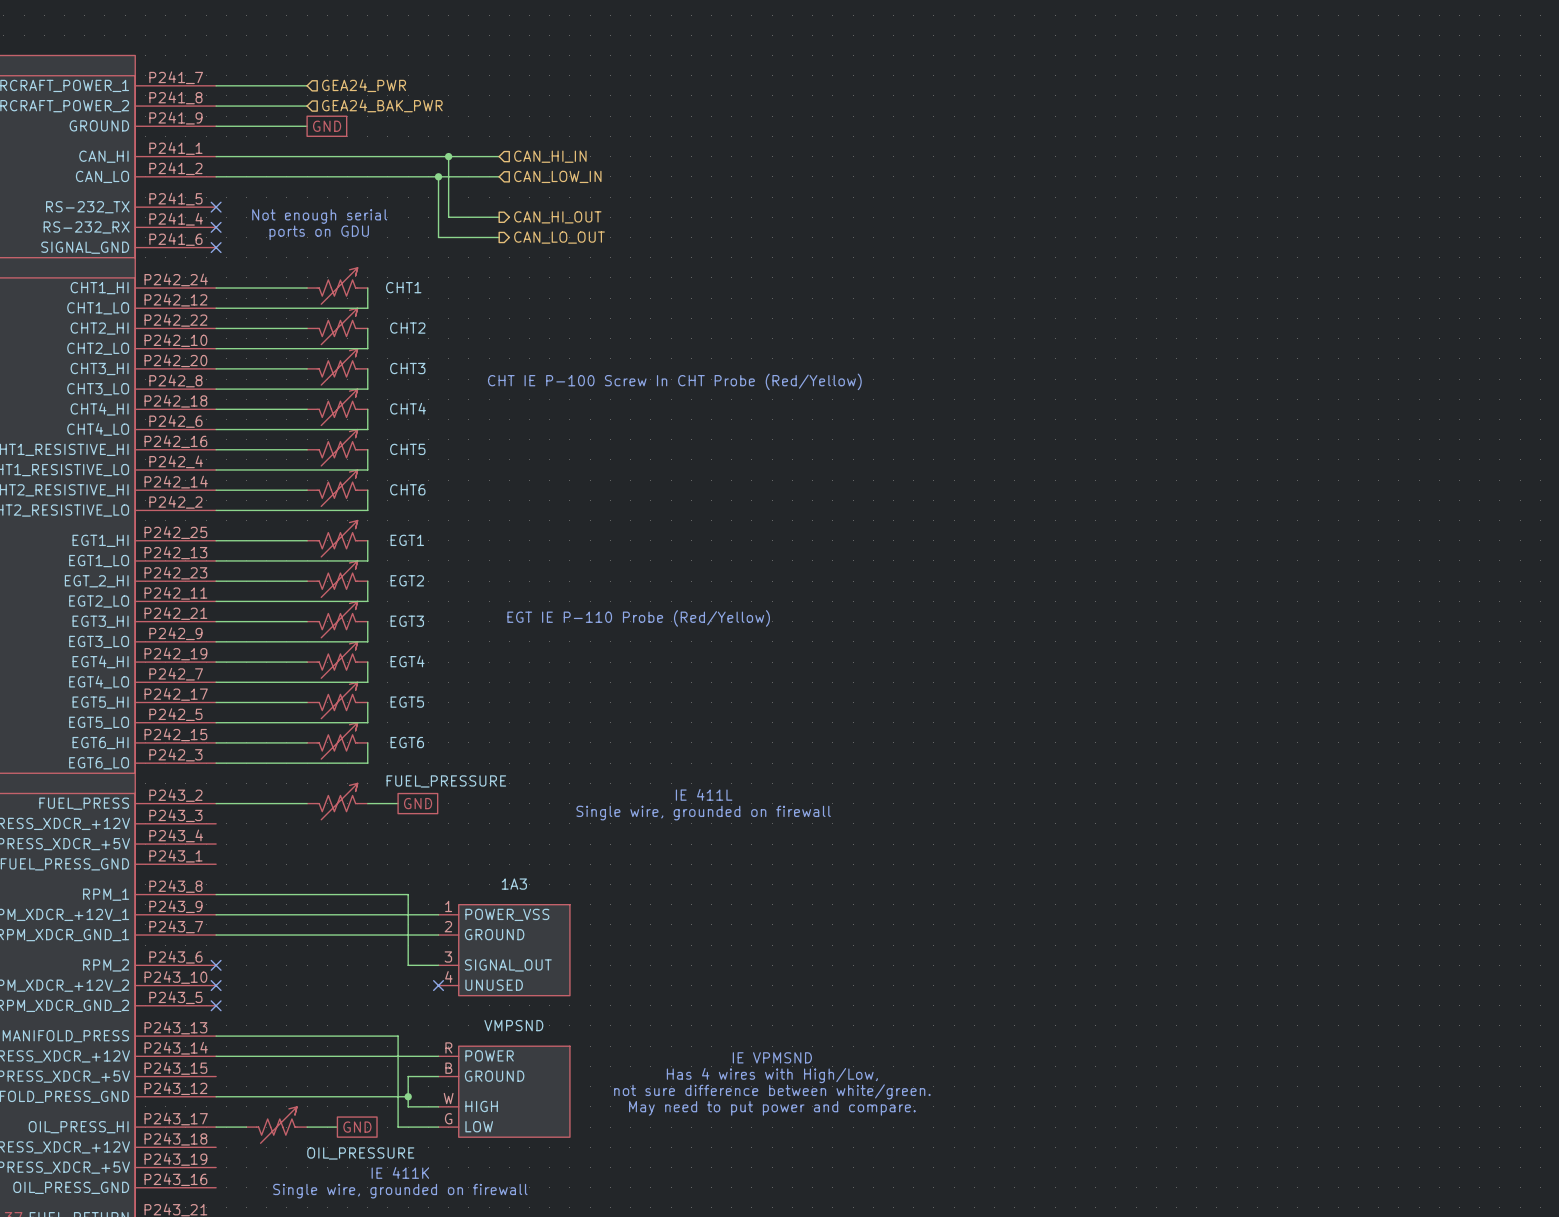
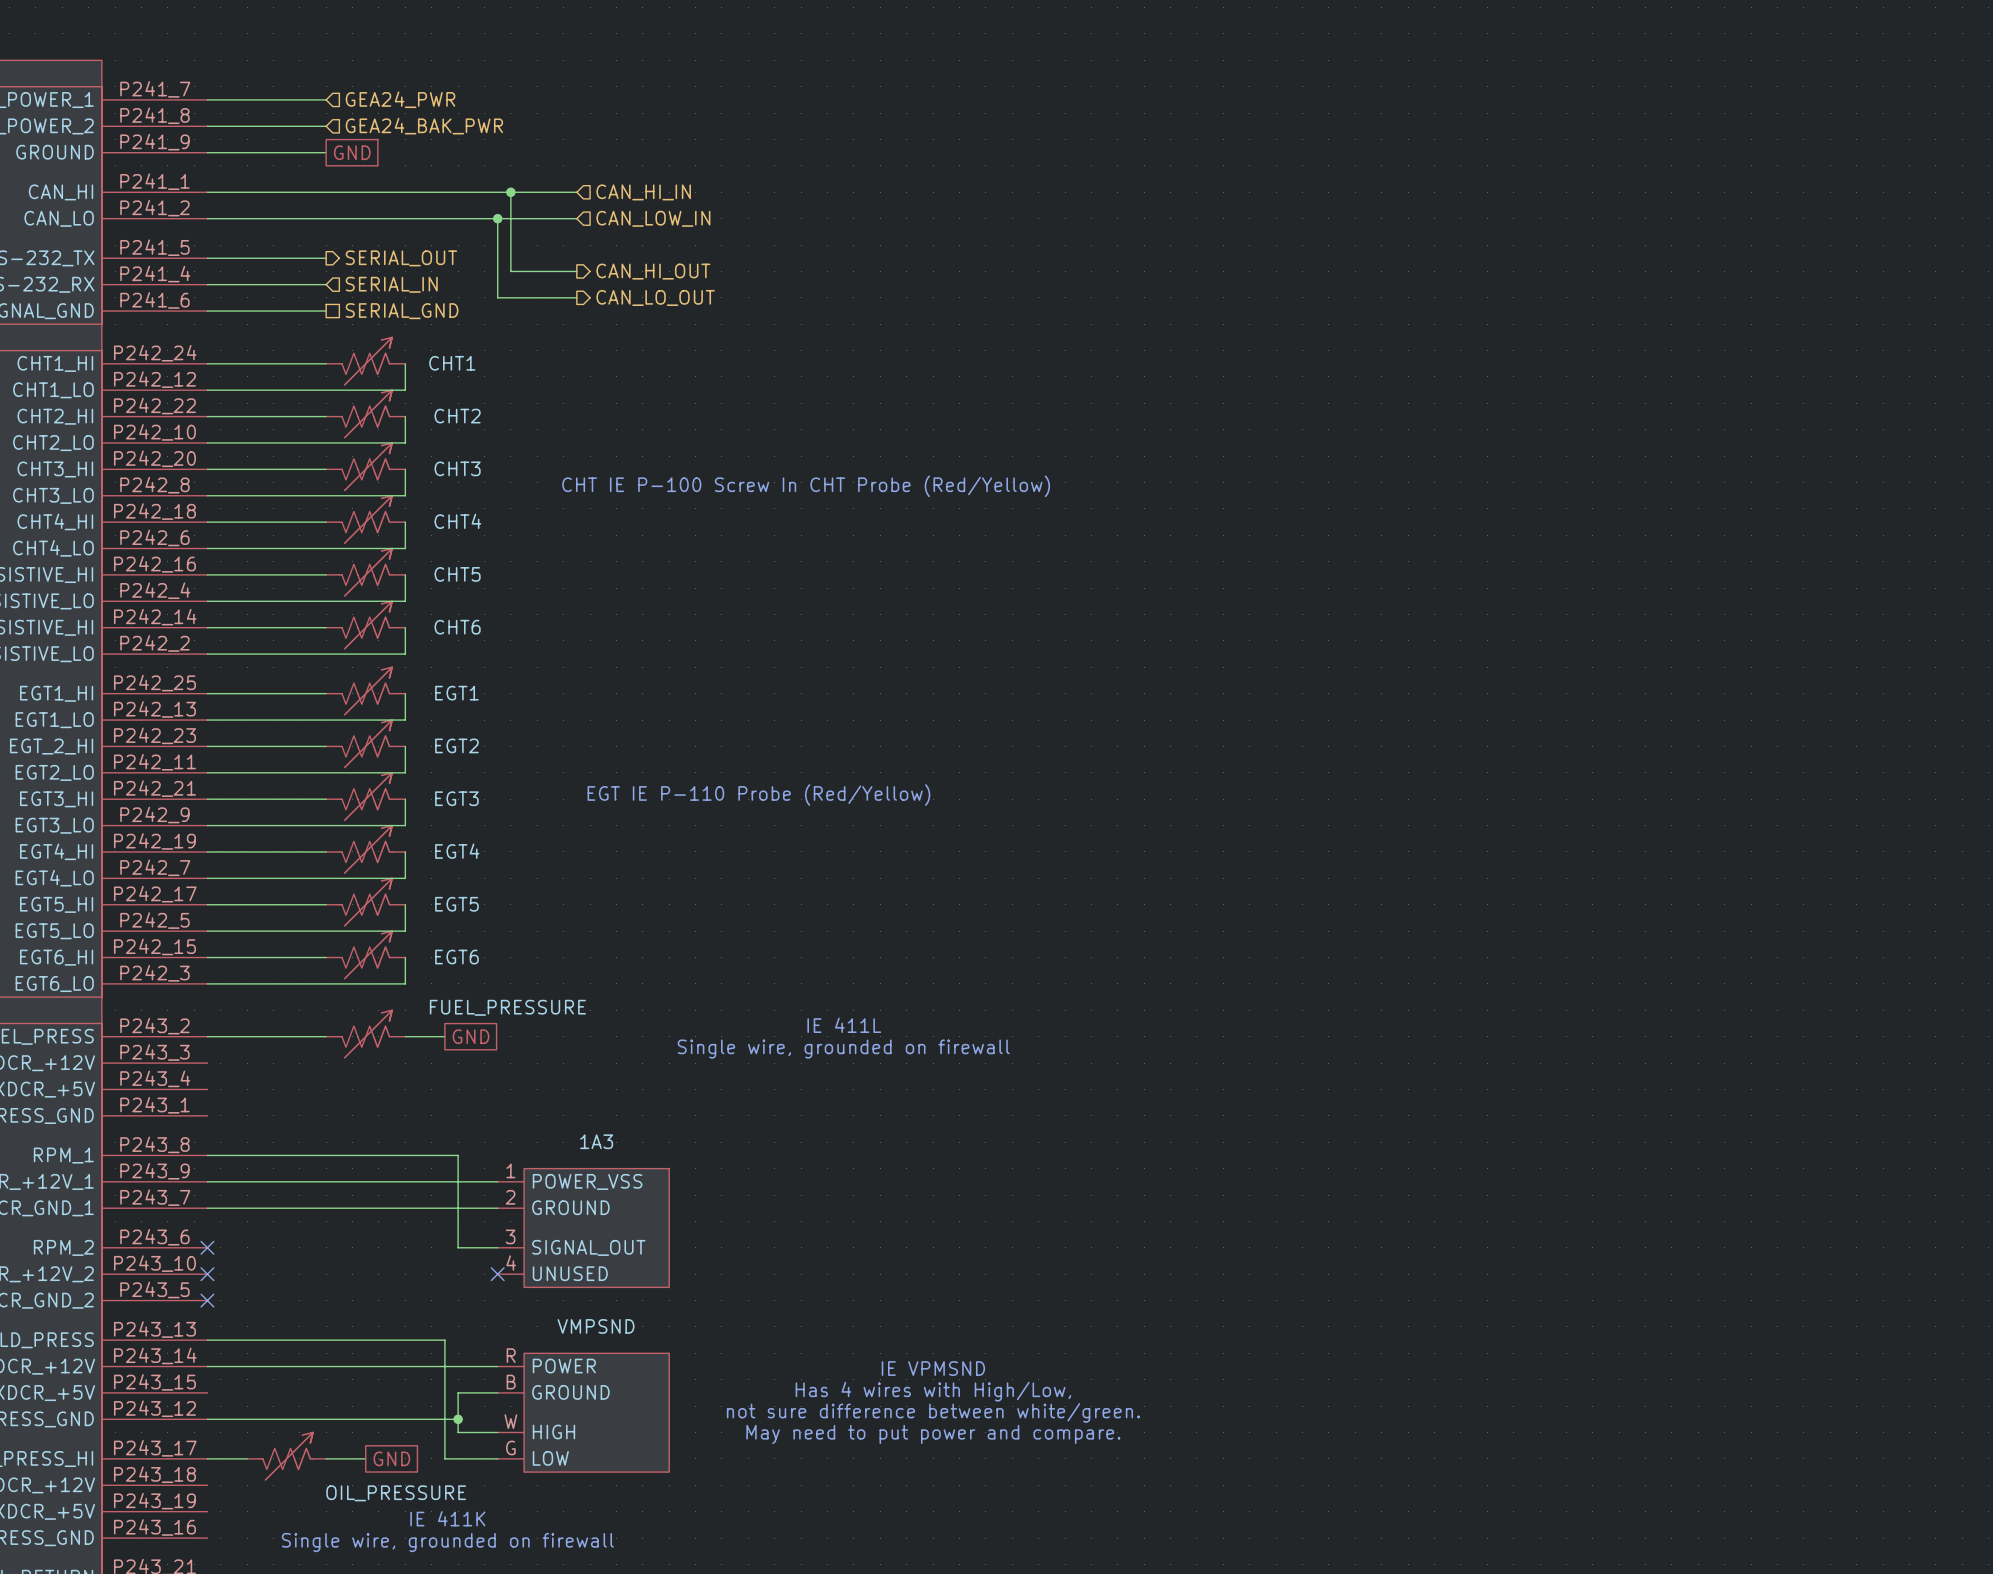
wire: none -> (207, 258) (326, 258)
no-connect mark: (216, 207) -> none
hierarchical label: none -> SERIAL_OUT (401, 258)
text: Not enough serial (319, 216) -> none
wire: none -> (207, 284) (326, 284)
no-connect mark: (216, 227) -> none
hierarchical label: none -> SERIAL_IN (391, 284)
text: ports on GDU (319, 232) -> none
wire: none -> (207, 311) (326, 311)
no-connect mark: (216, 247) -> none
hierarchical label: none -> SERIAL_GND (402, 311)

